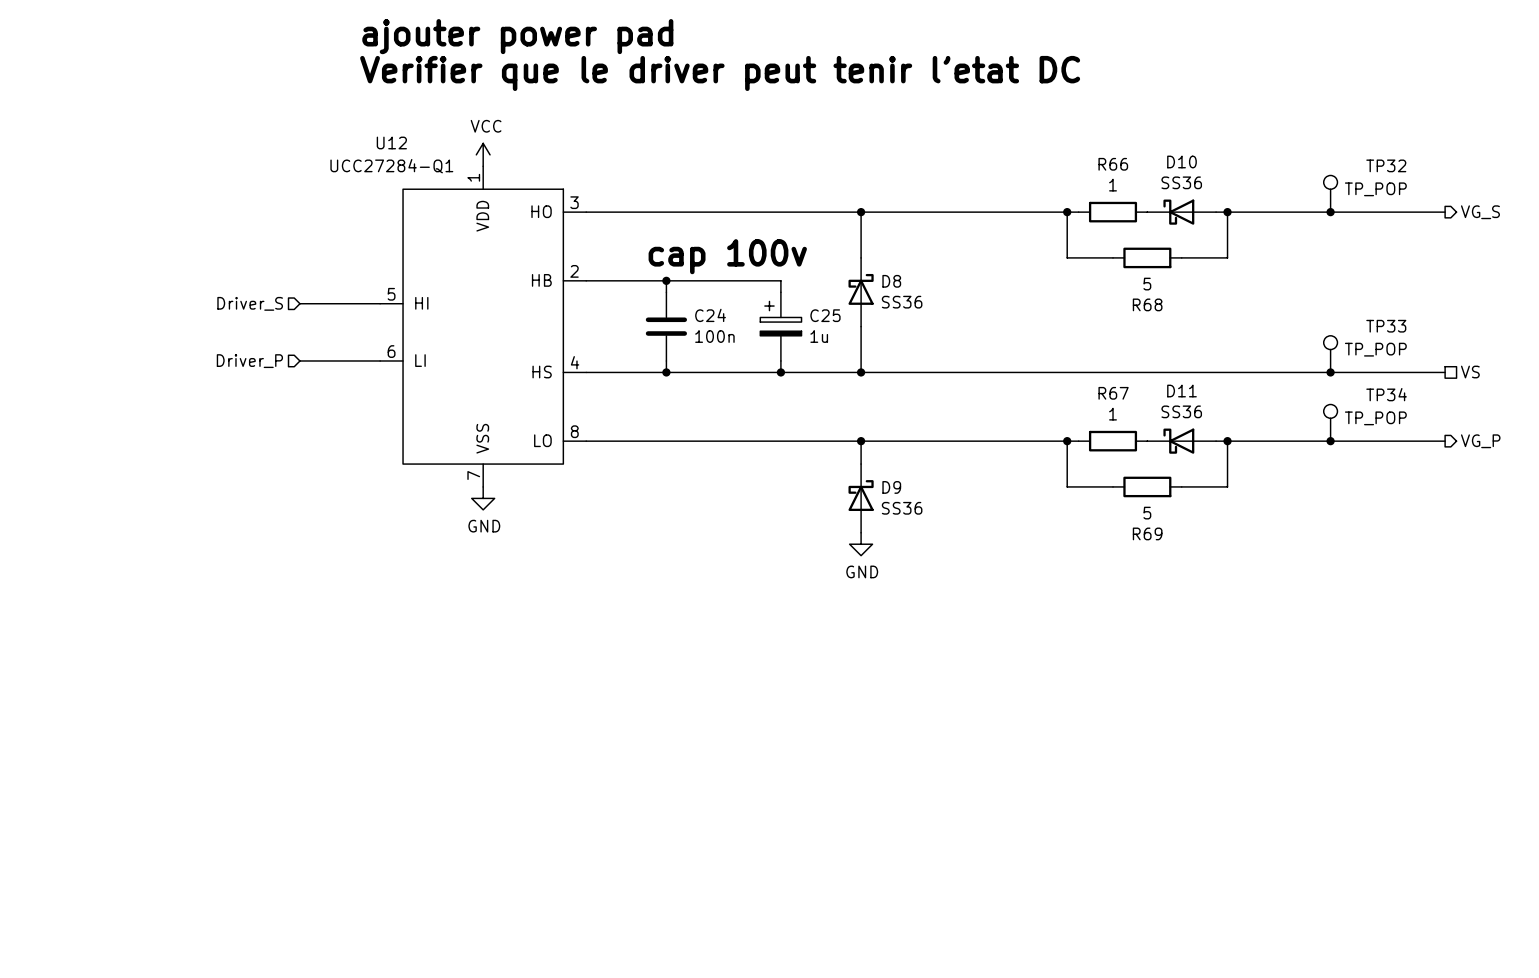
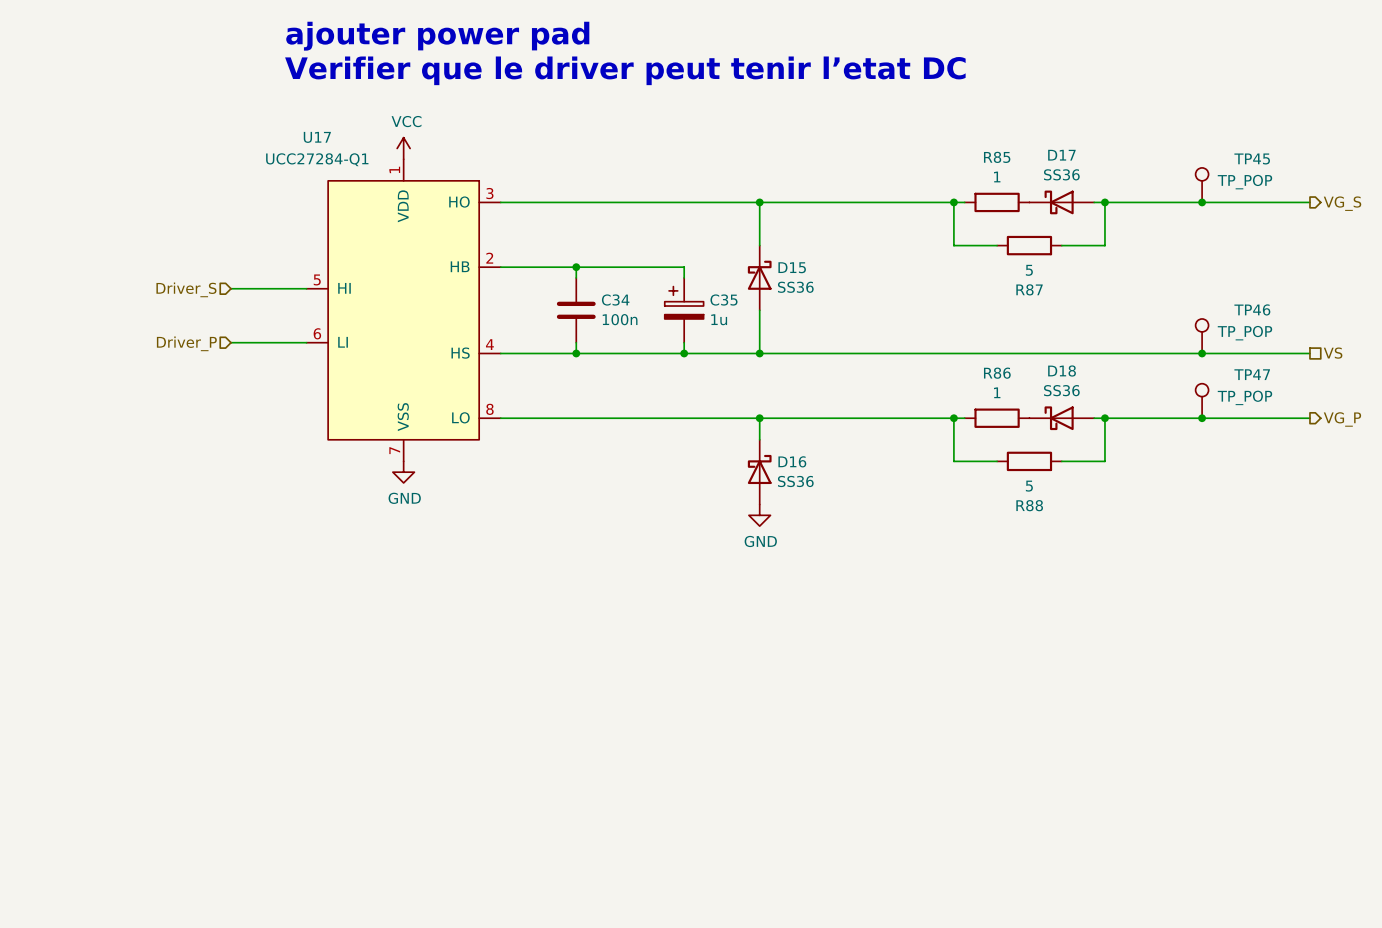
U12 name: U12 (391, 142) -> U17 (317, 137)
D10 name: D10 (1181, 162) -> D17 (1061, 155)
R66 name: R66 (1113, 164) -> R85 (997, 157)
TP32 name: TP32 (1386, 165) -> TP45 (1252, 158)
text: cap 100v (727, 256) -> none
D8 name: D8 (891, 281) -> D15 (792, 267)
R68 name: R68 (1147, 304) -> R87 (1029, 289)
C24 name: C24 (710, 315) -> C34 (615, 300)
C25 name: C25 (825, 315) -> C35 (723, 300)
TP33 name: TP33 (1386, 326) -> TP46 (1252, 309)
D11 name: D11 (1181, 391) -> D18 (1062, 371)
R67 name: R67 (1113, 393) -> R86 (997, 373)
TP34 name: TP34 (1386, 394) -> TP47 (1252, 374)
D9 name: D9 (891, 487) -> D16 (792, 461)
R69 name: R69 (1147, 533) -> R88 (1029, 505)

